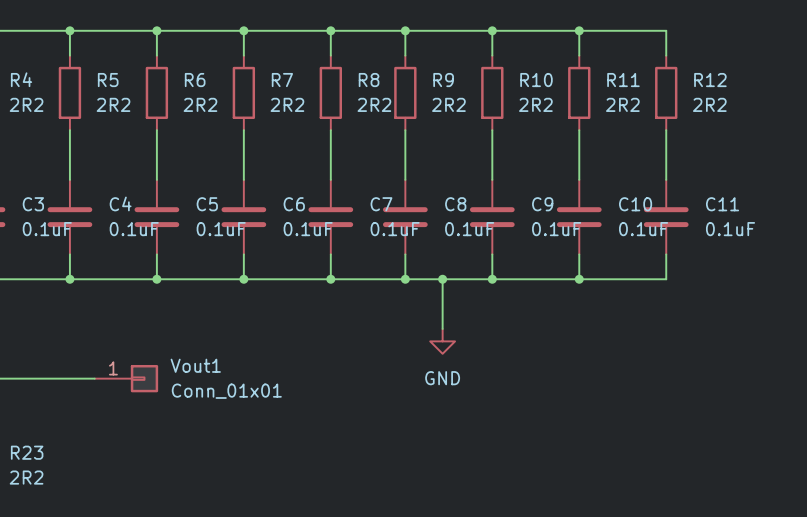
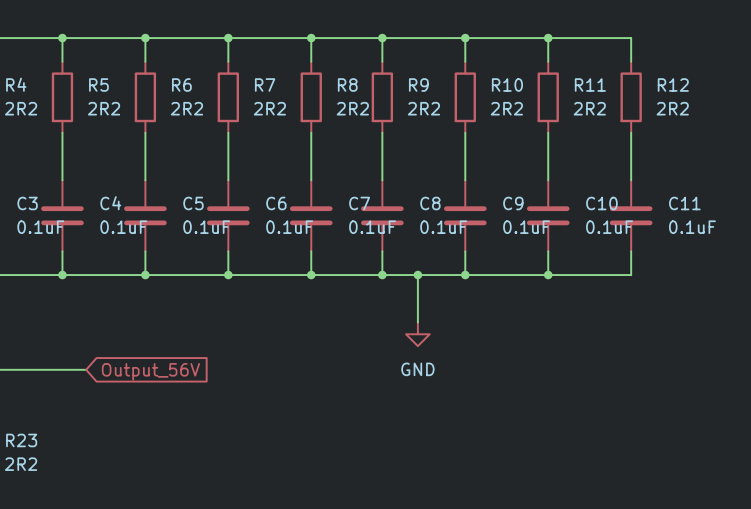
Vout1: Conn_01x01 (126, 378) -> none
global label: none -> Output_56V (150, 371)

